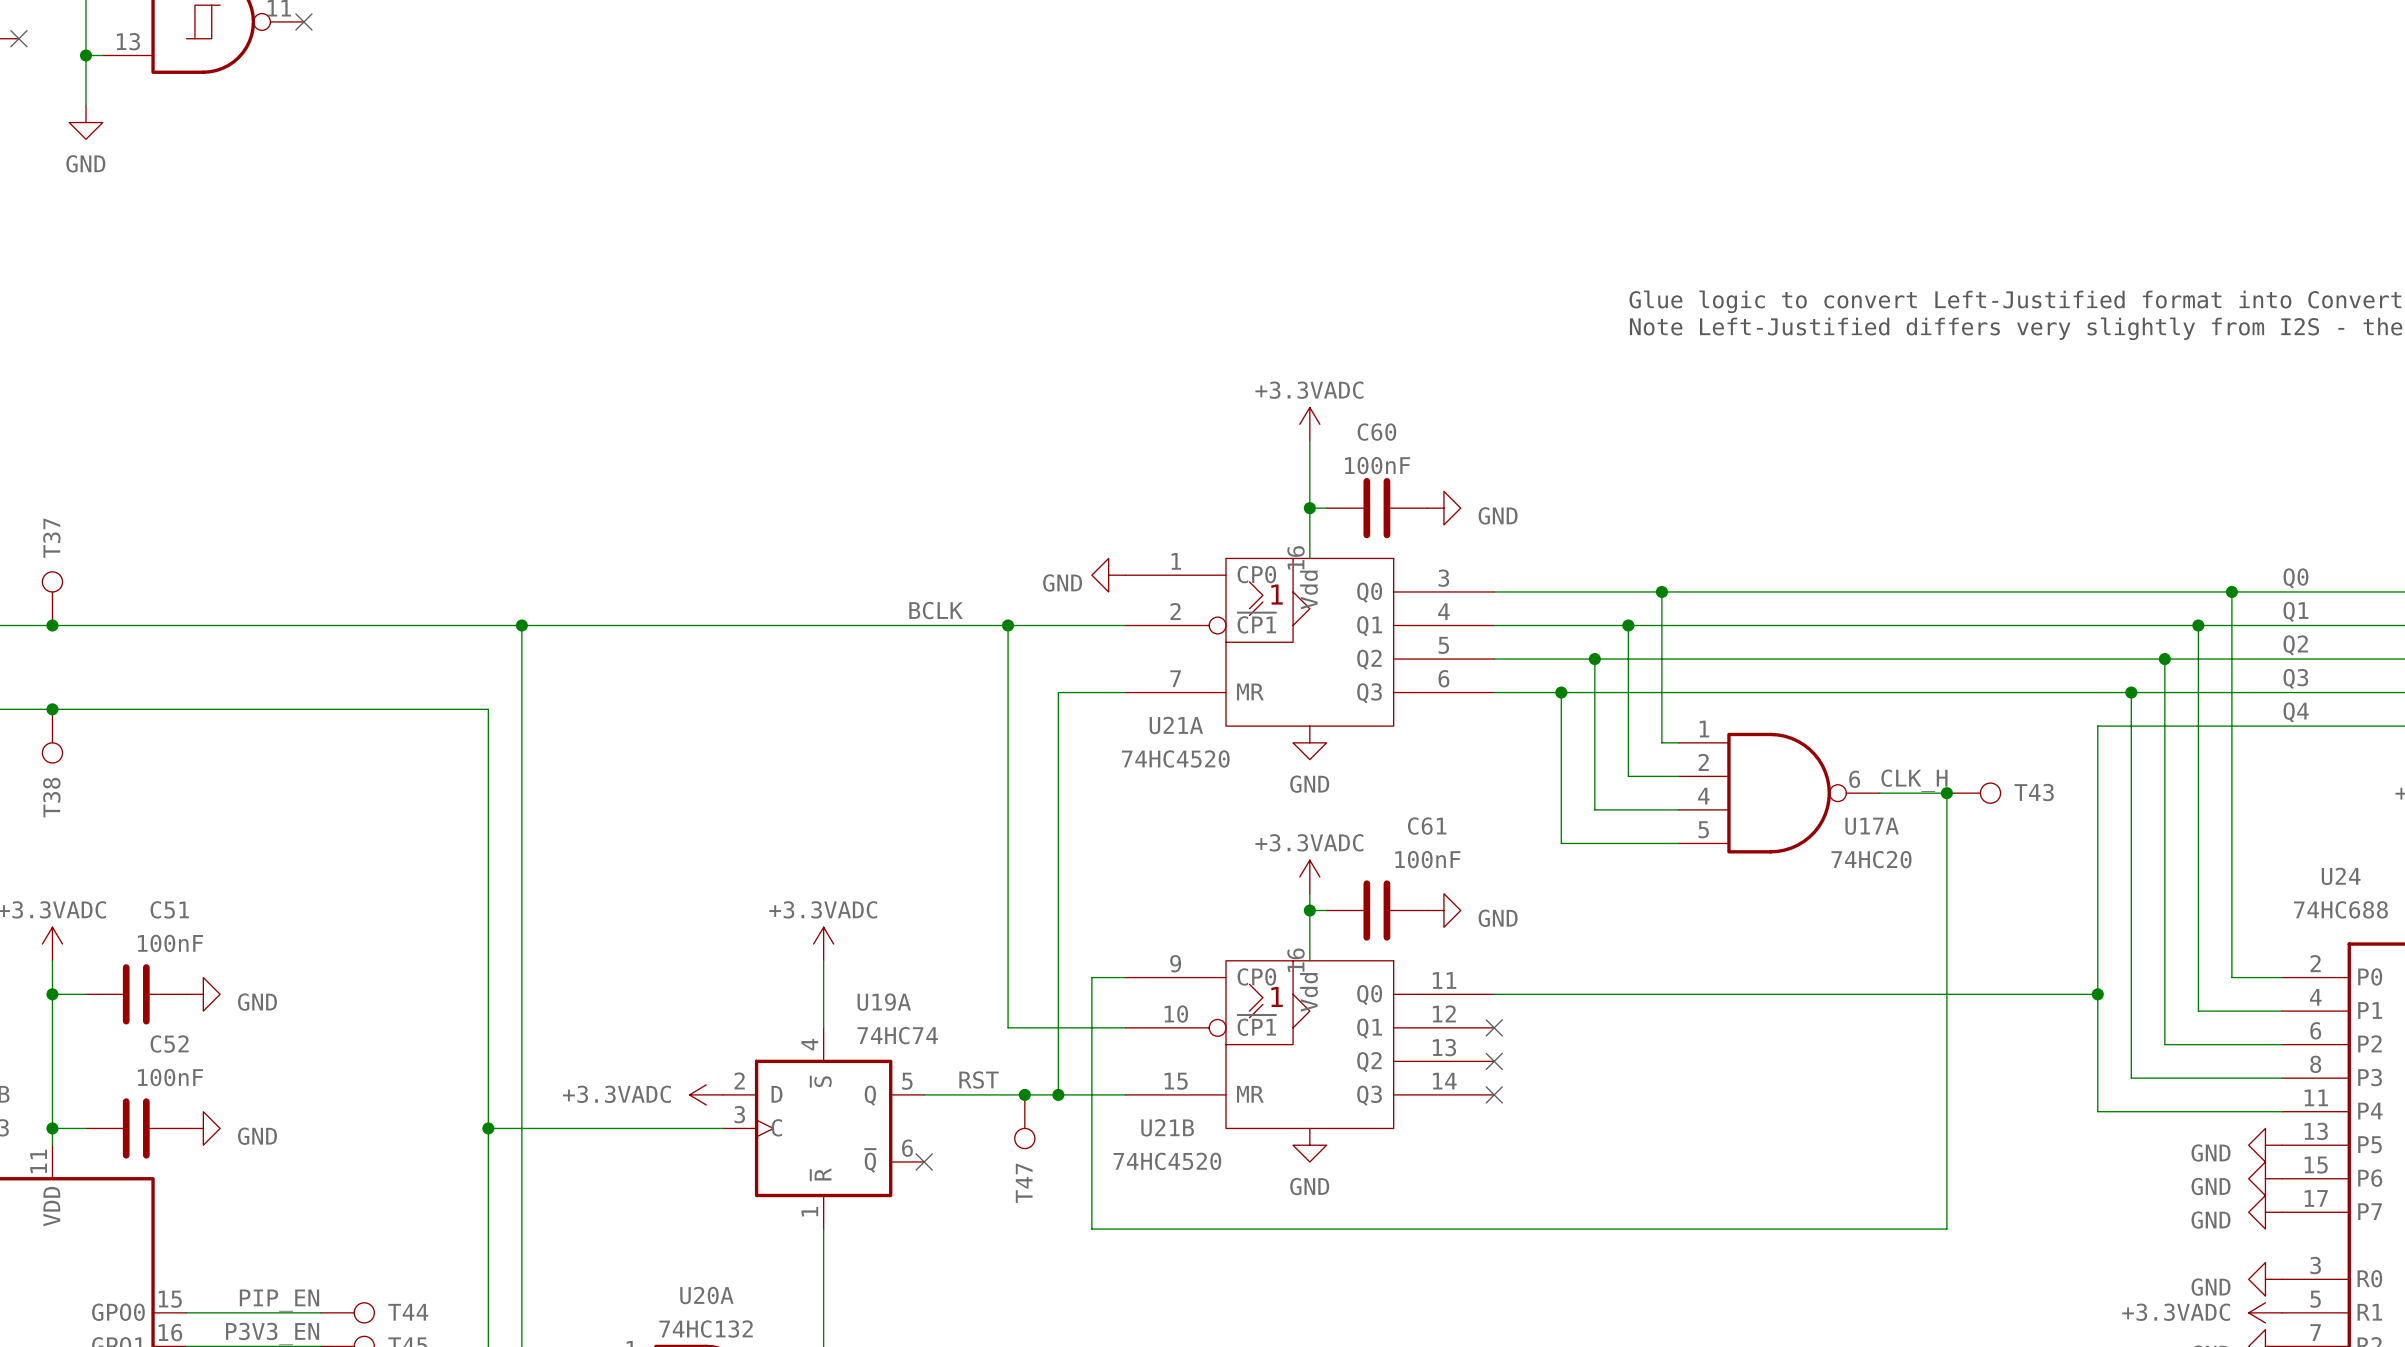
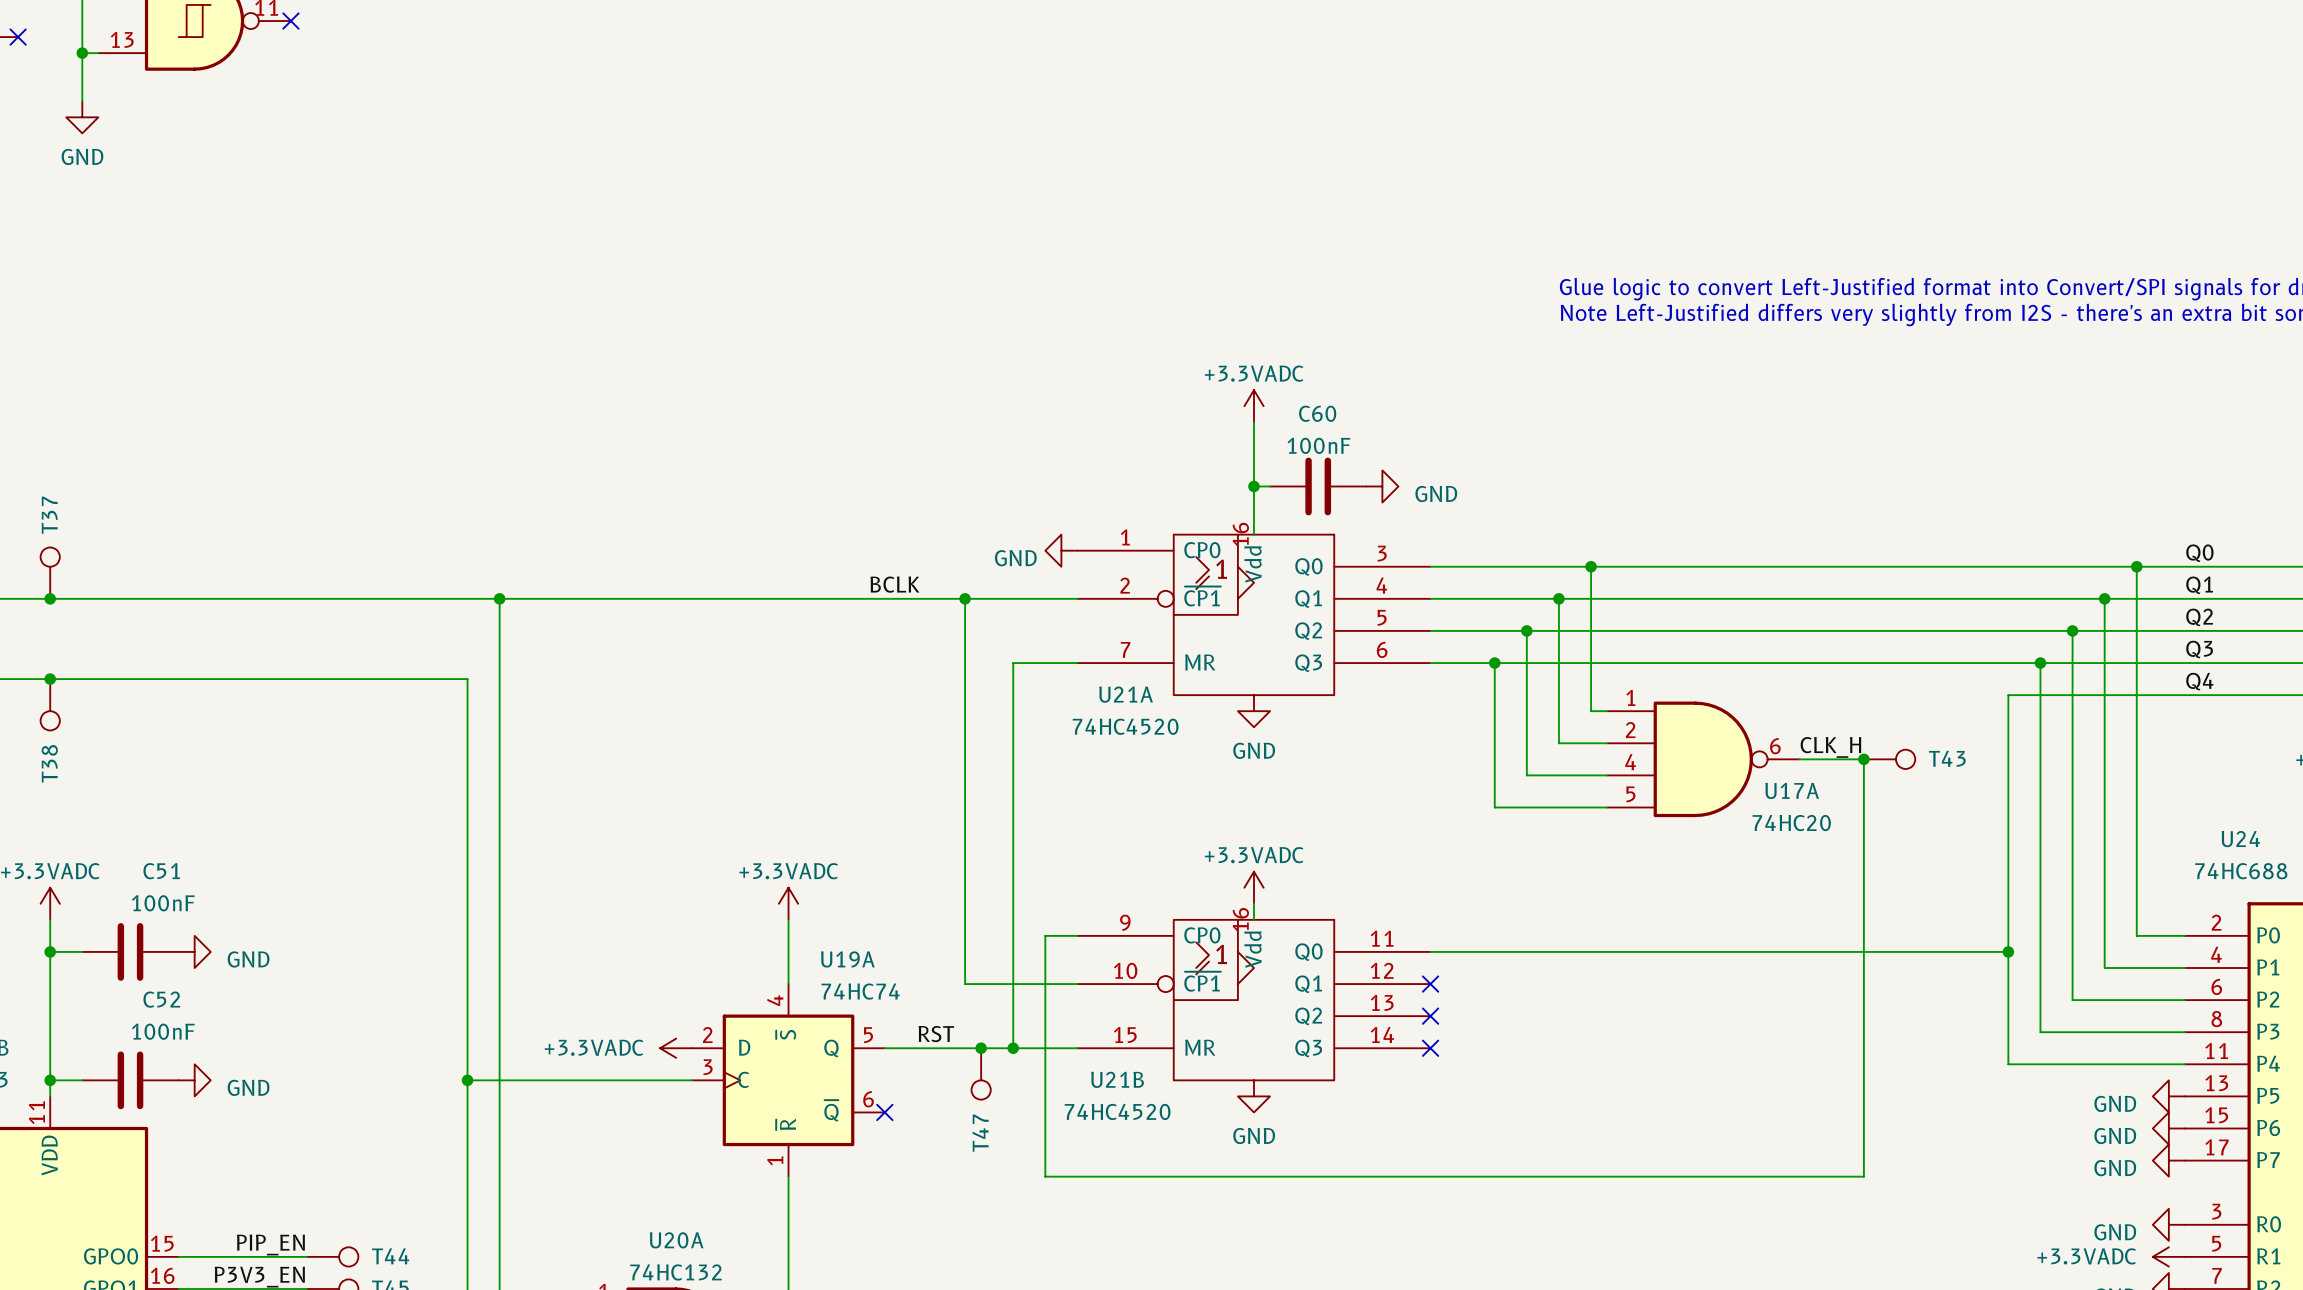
power symbol position: +3.3VADC (1309, 876) -> +3.3VADC (1253, 887)
wire: (1309, 910) (1326, 910) -> none
junction: (1309, 910) -> none
C61: 100nF (1376, 910) -> none
power symbol: GND (1443, 910) -> none

